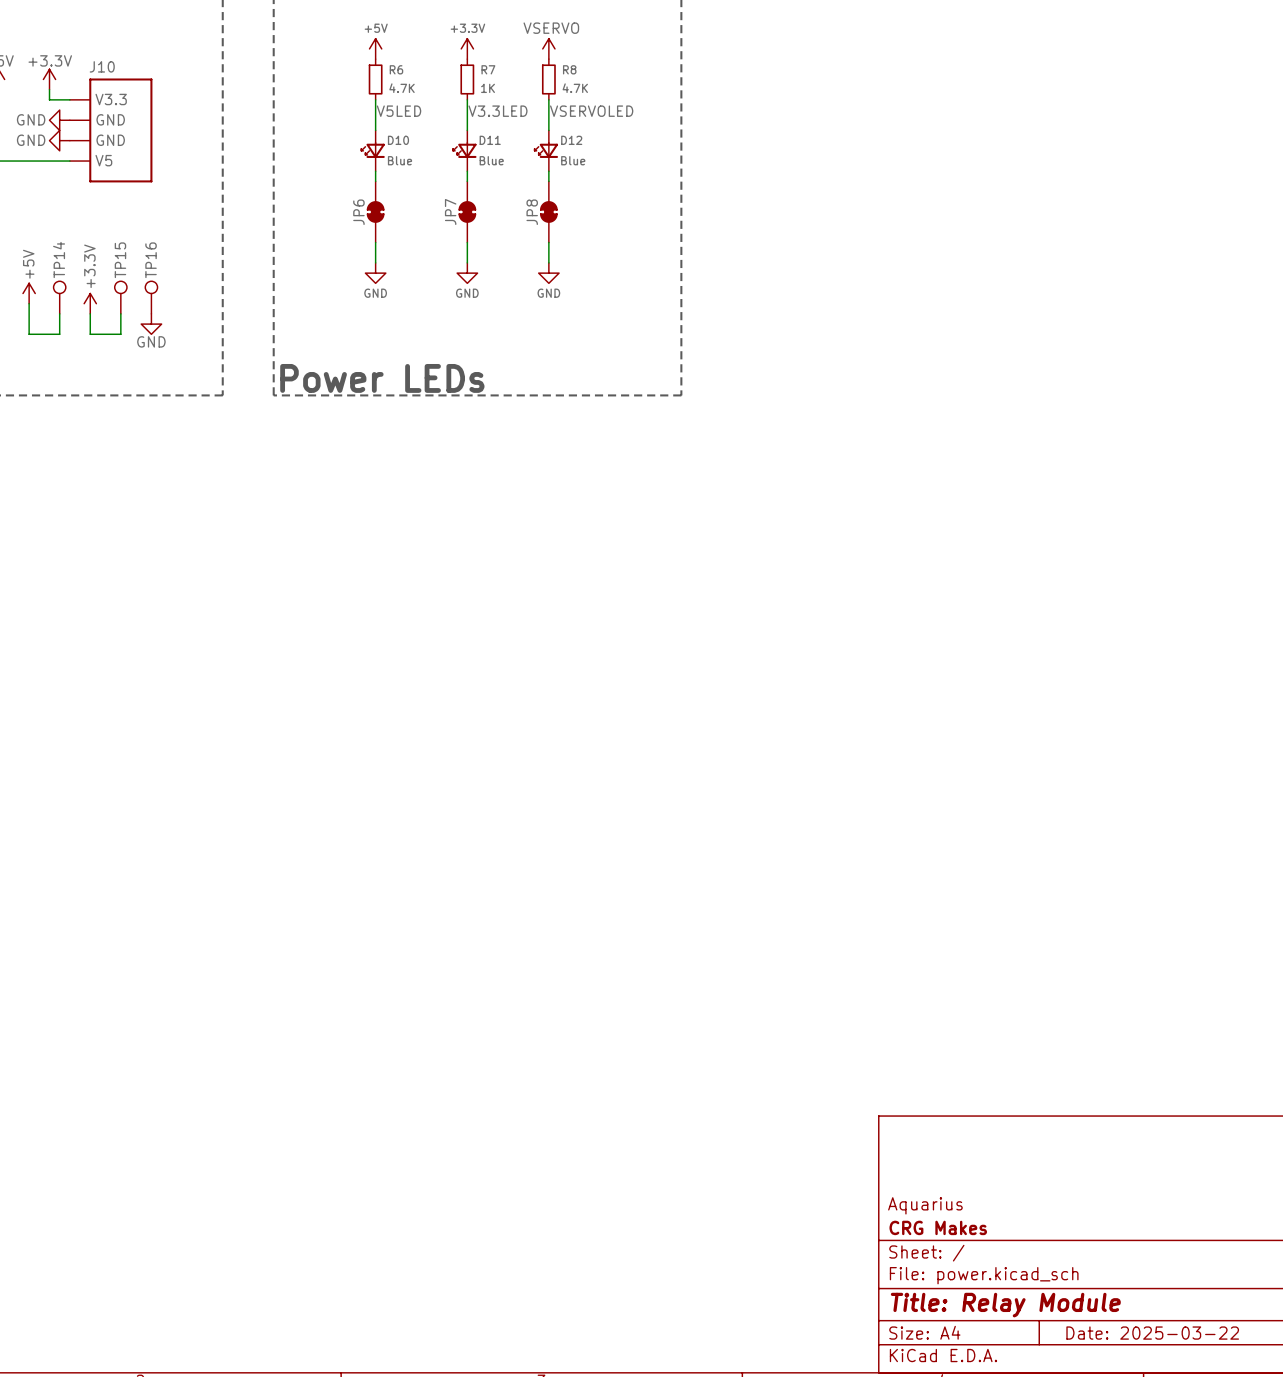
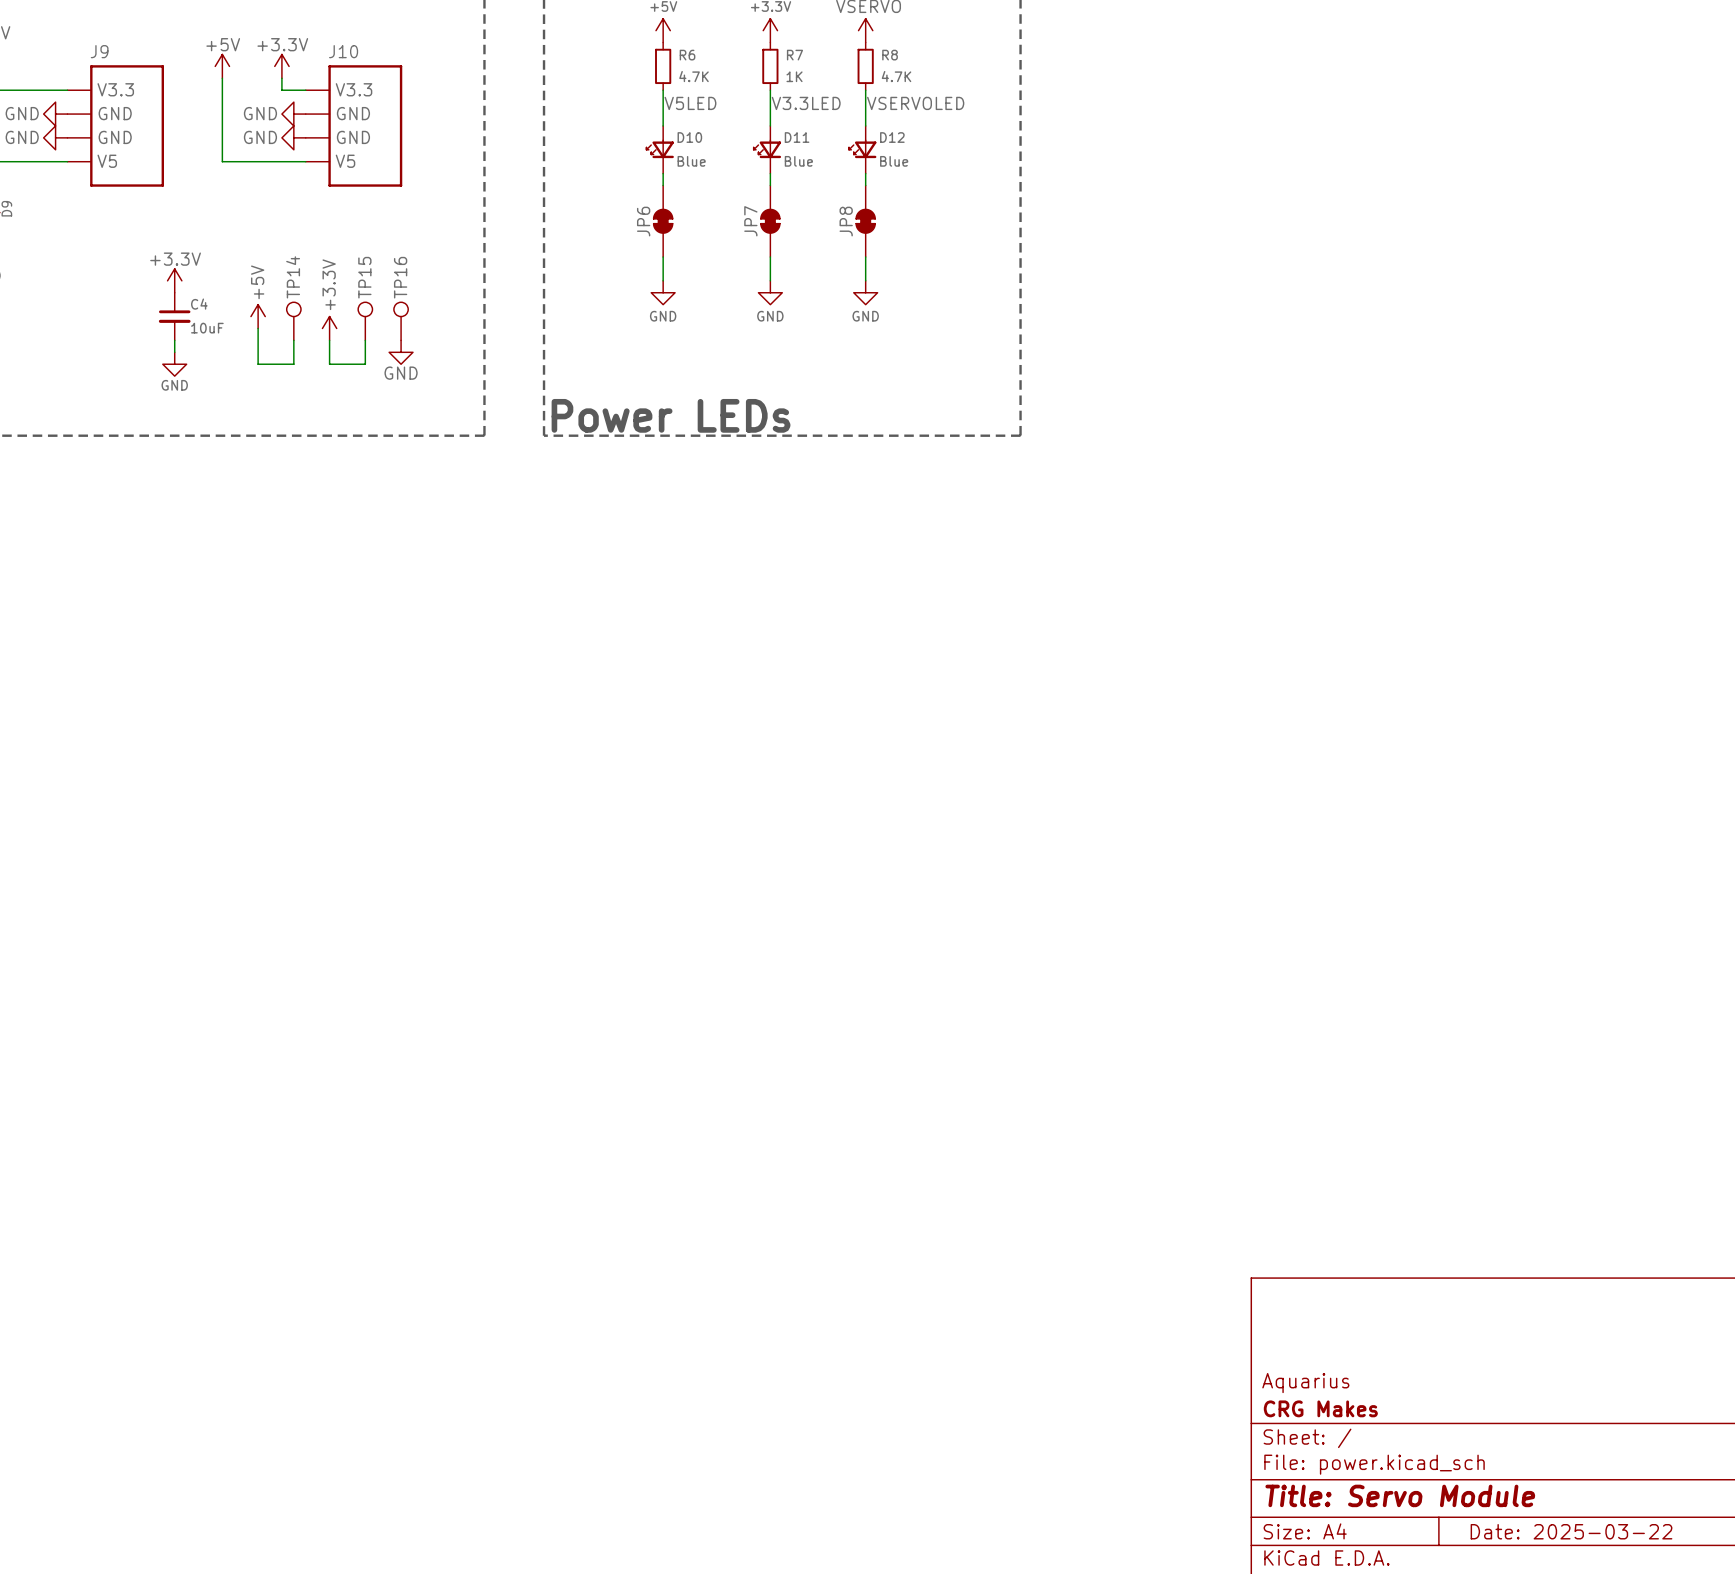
title block: Title: Relay Module (1005, 1305) -> Title: Servo Module (1400, 1495)

